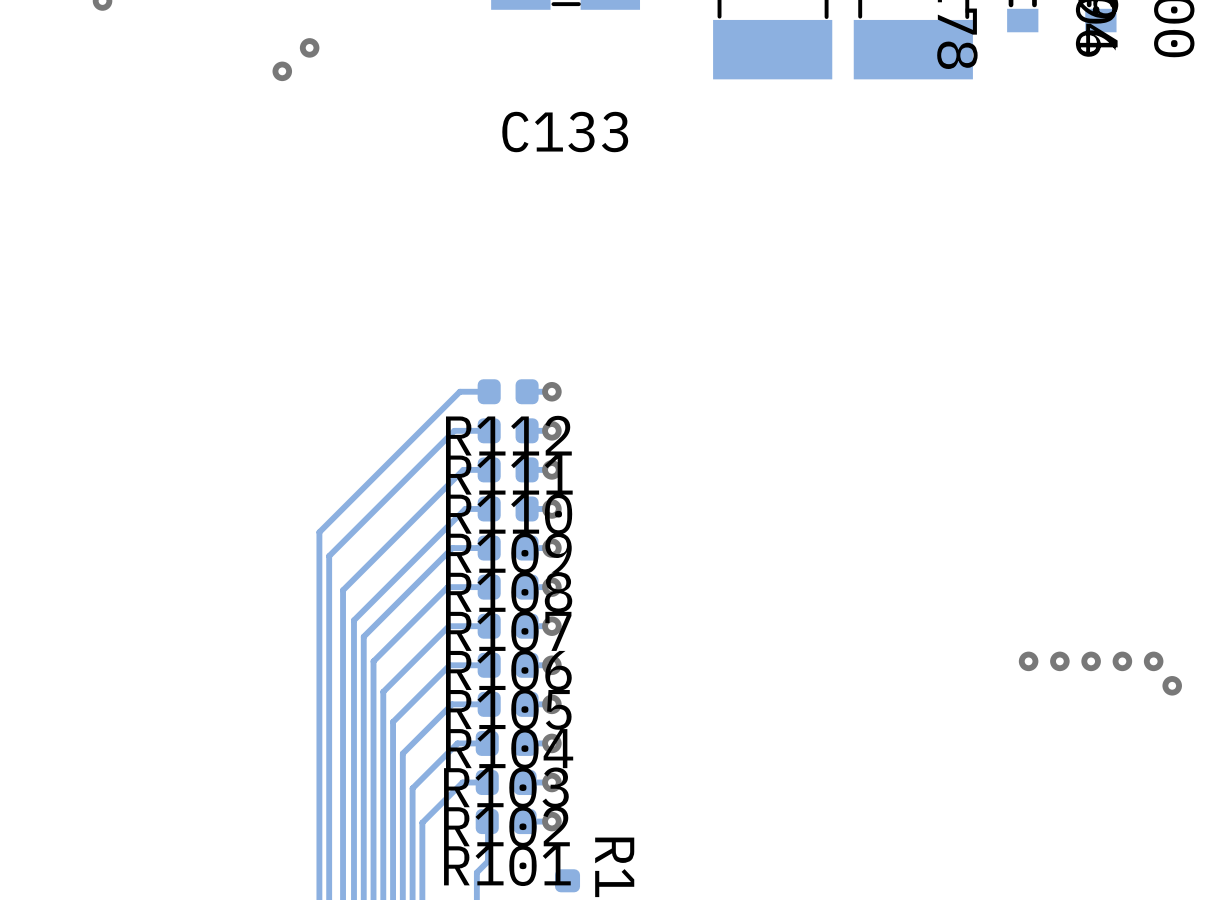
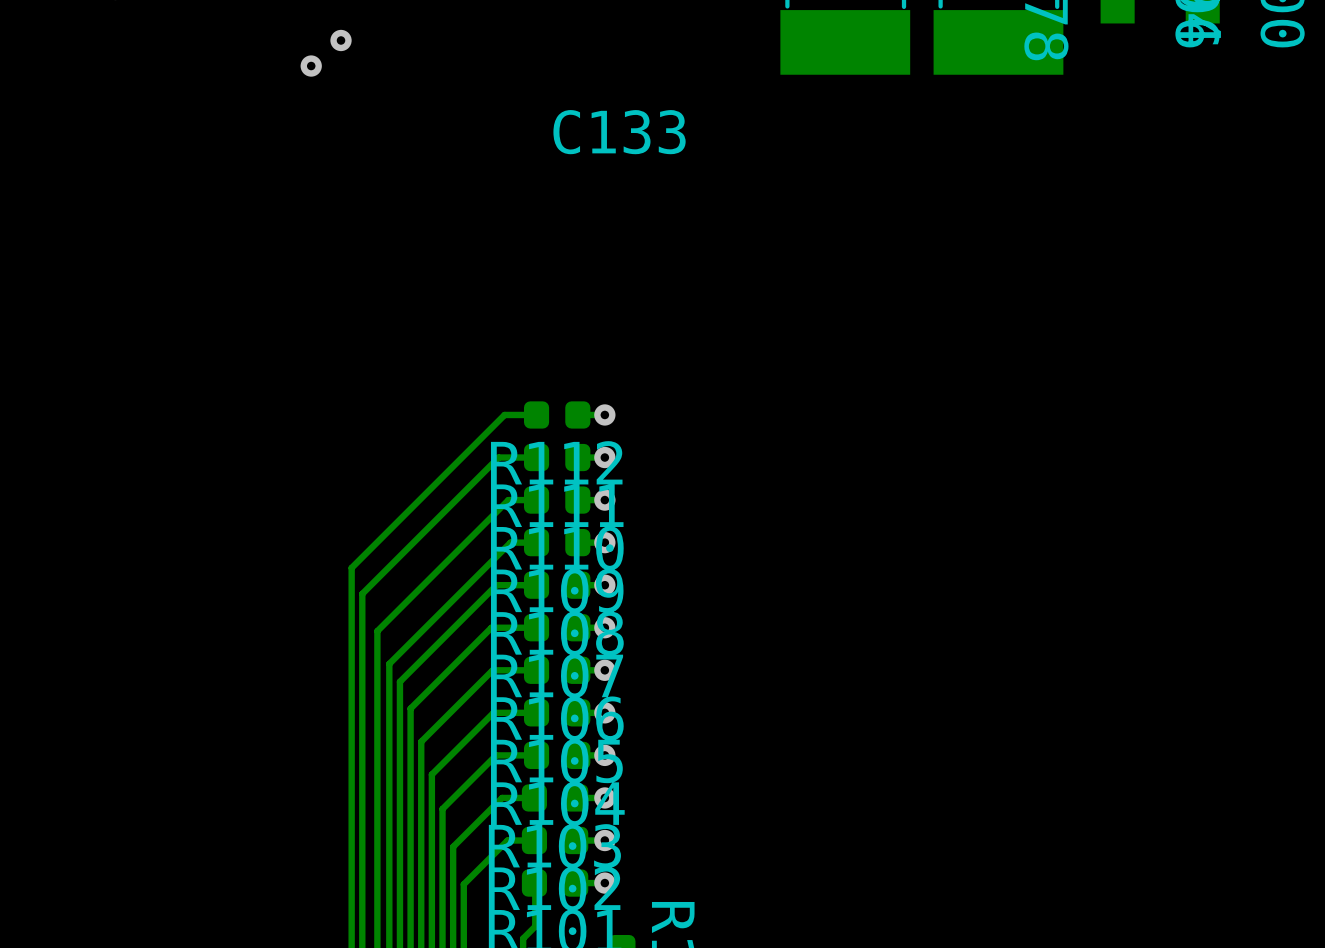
via: (1028, 661) -> none
via: (1059, 661) -> none
via: (1091, 661) -> none
via: (1122, 661) -> none
via: (1153, 661) -> none
via: (1172, 685) -> none

